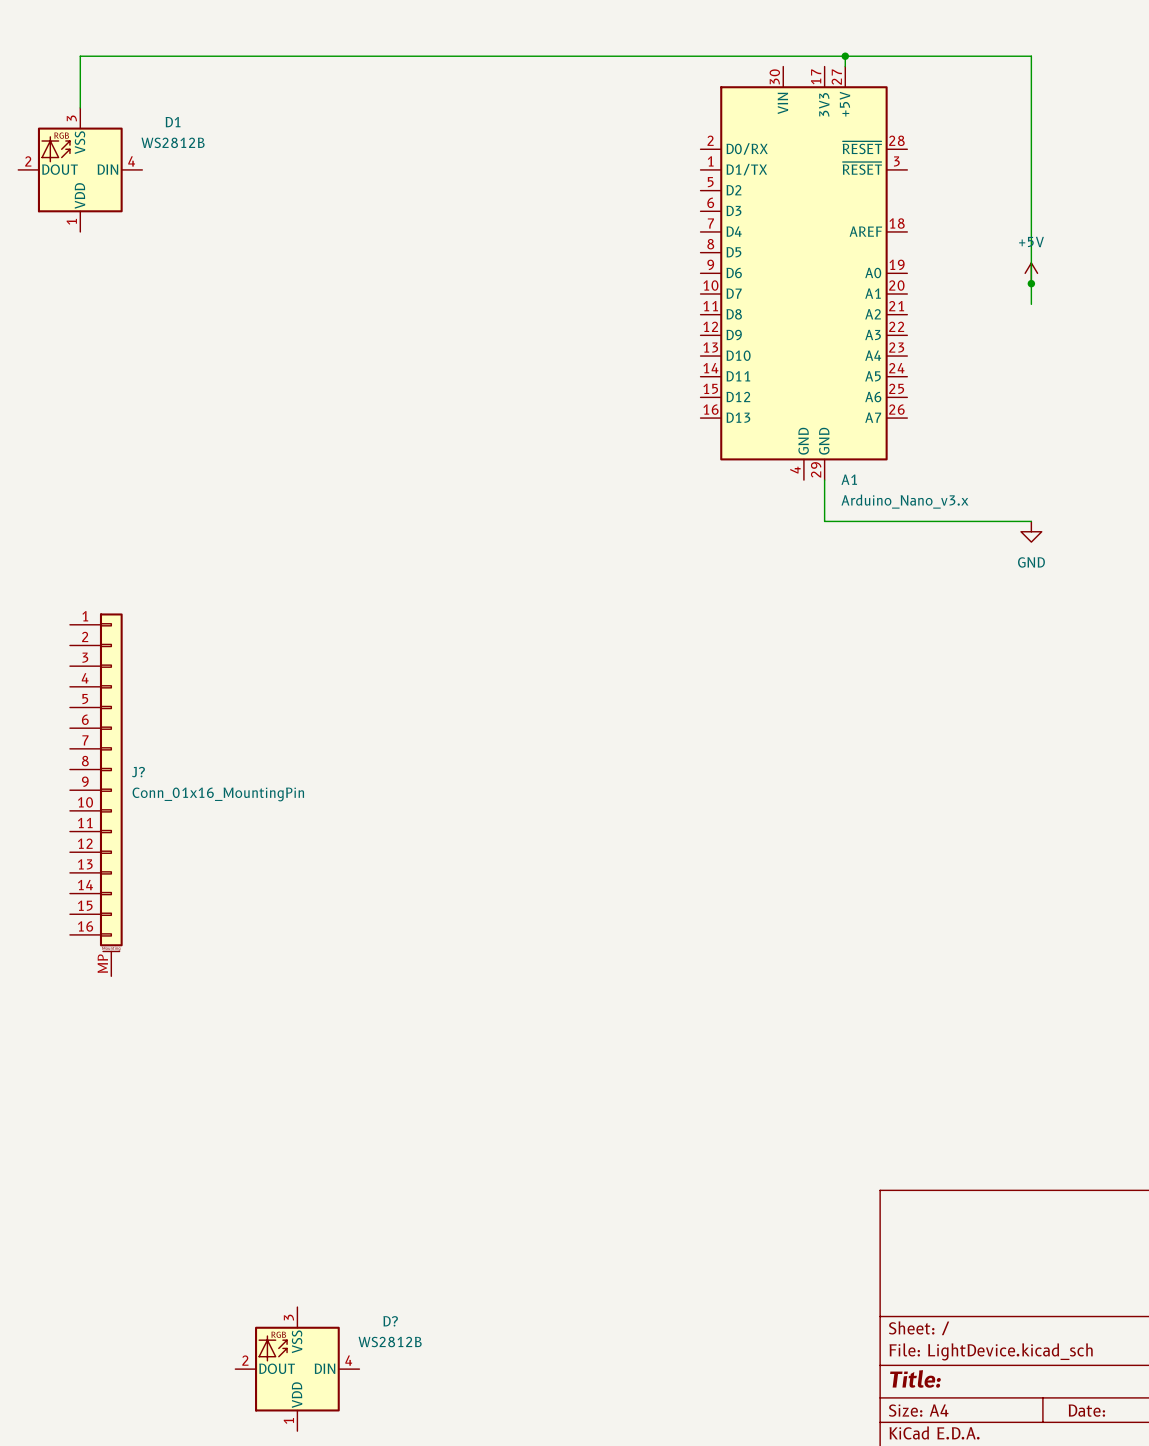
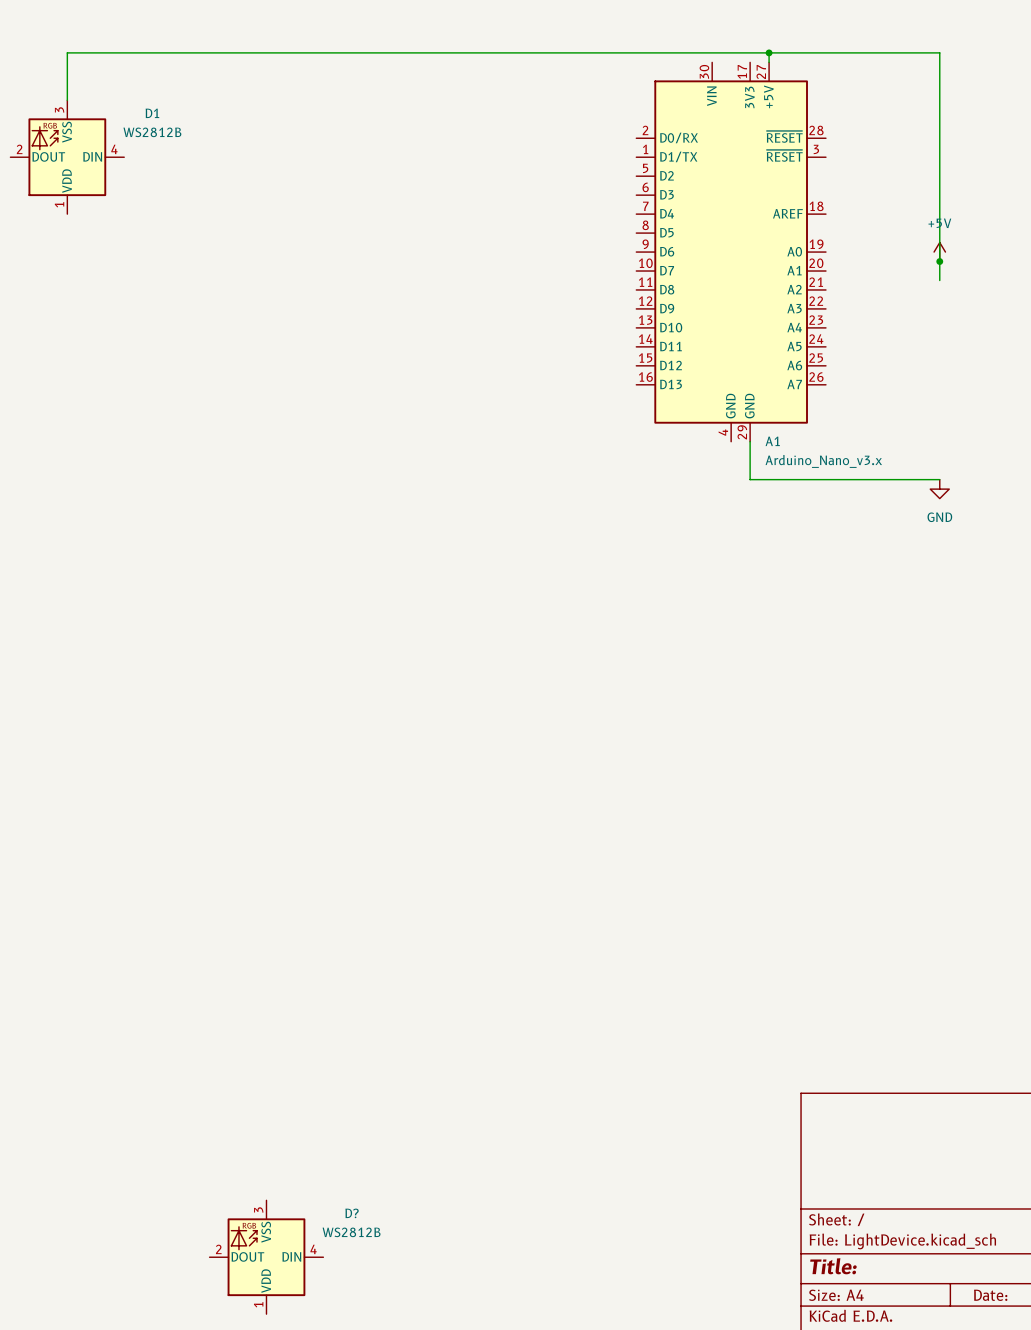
J?: Conn_01x16_MountingPin (96, 794) -> none

